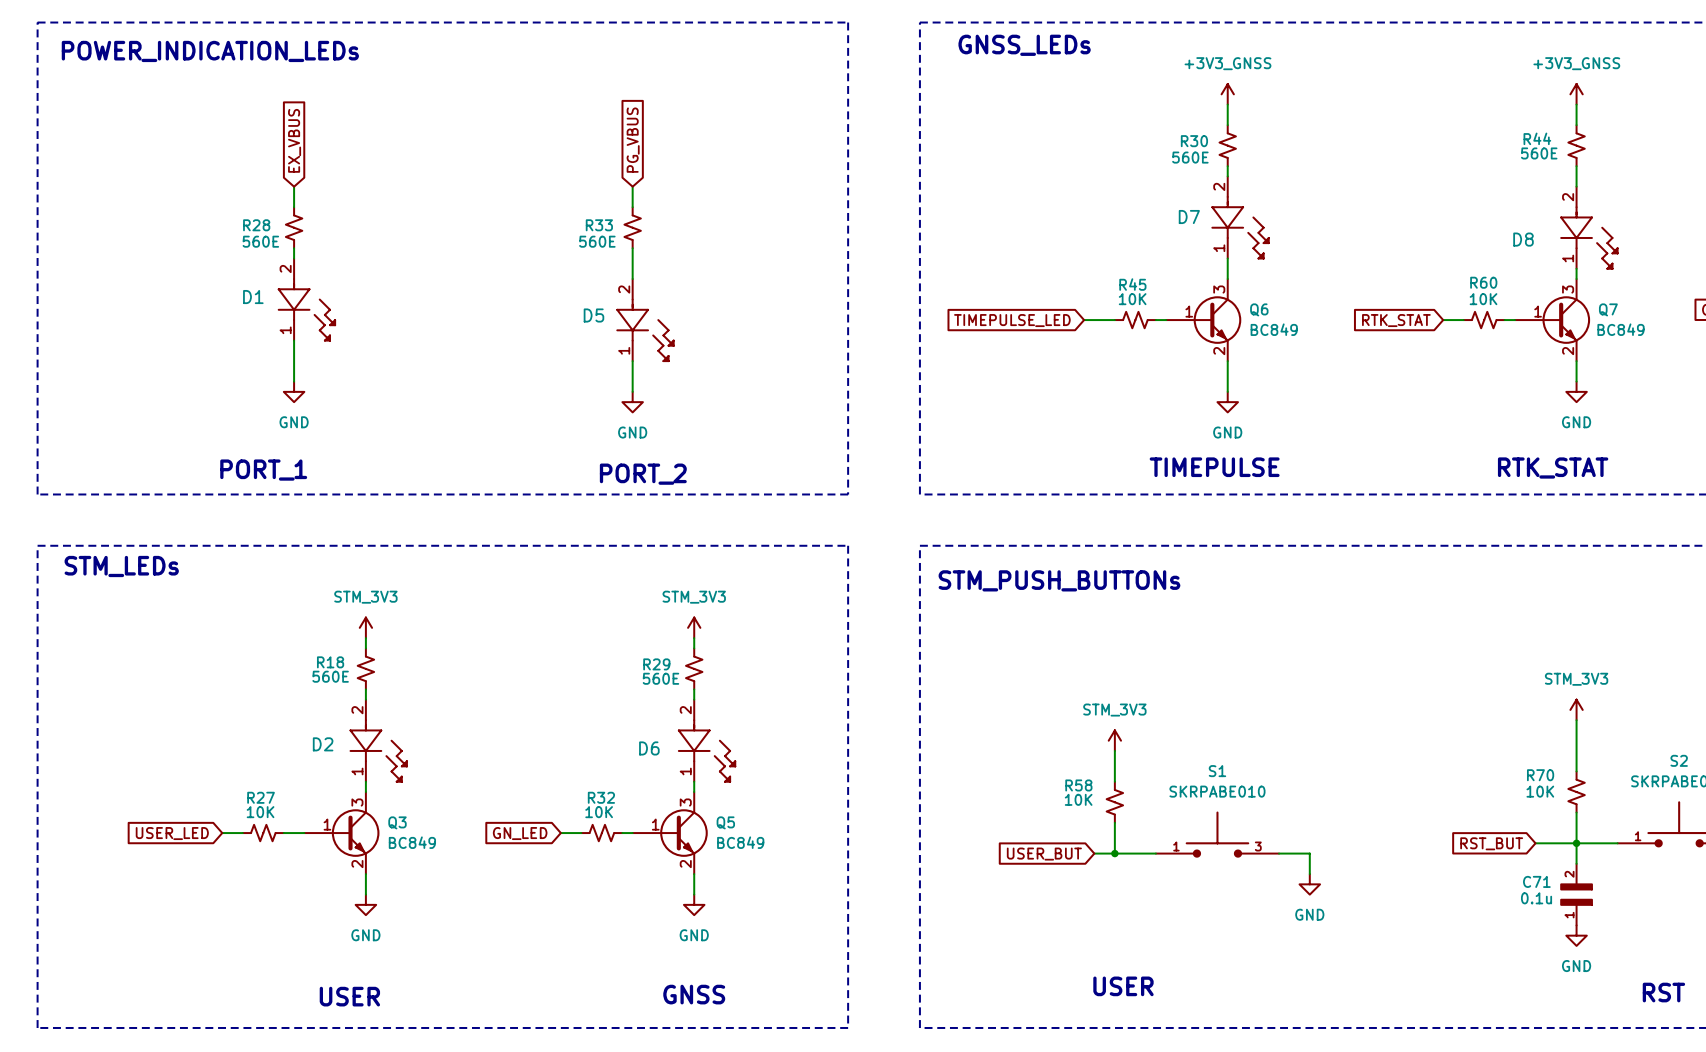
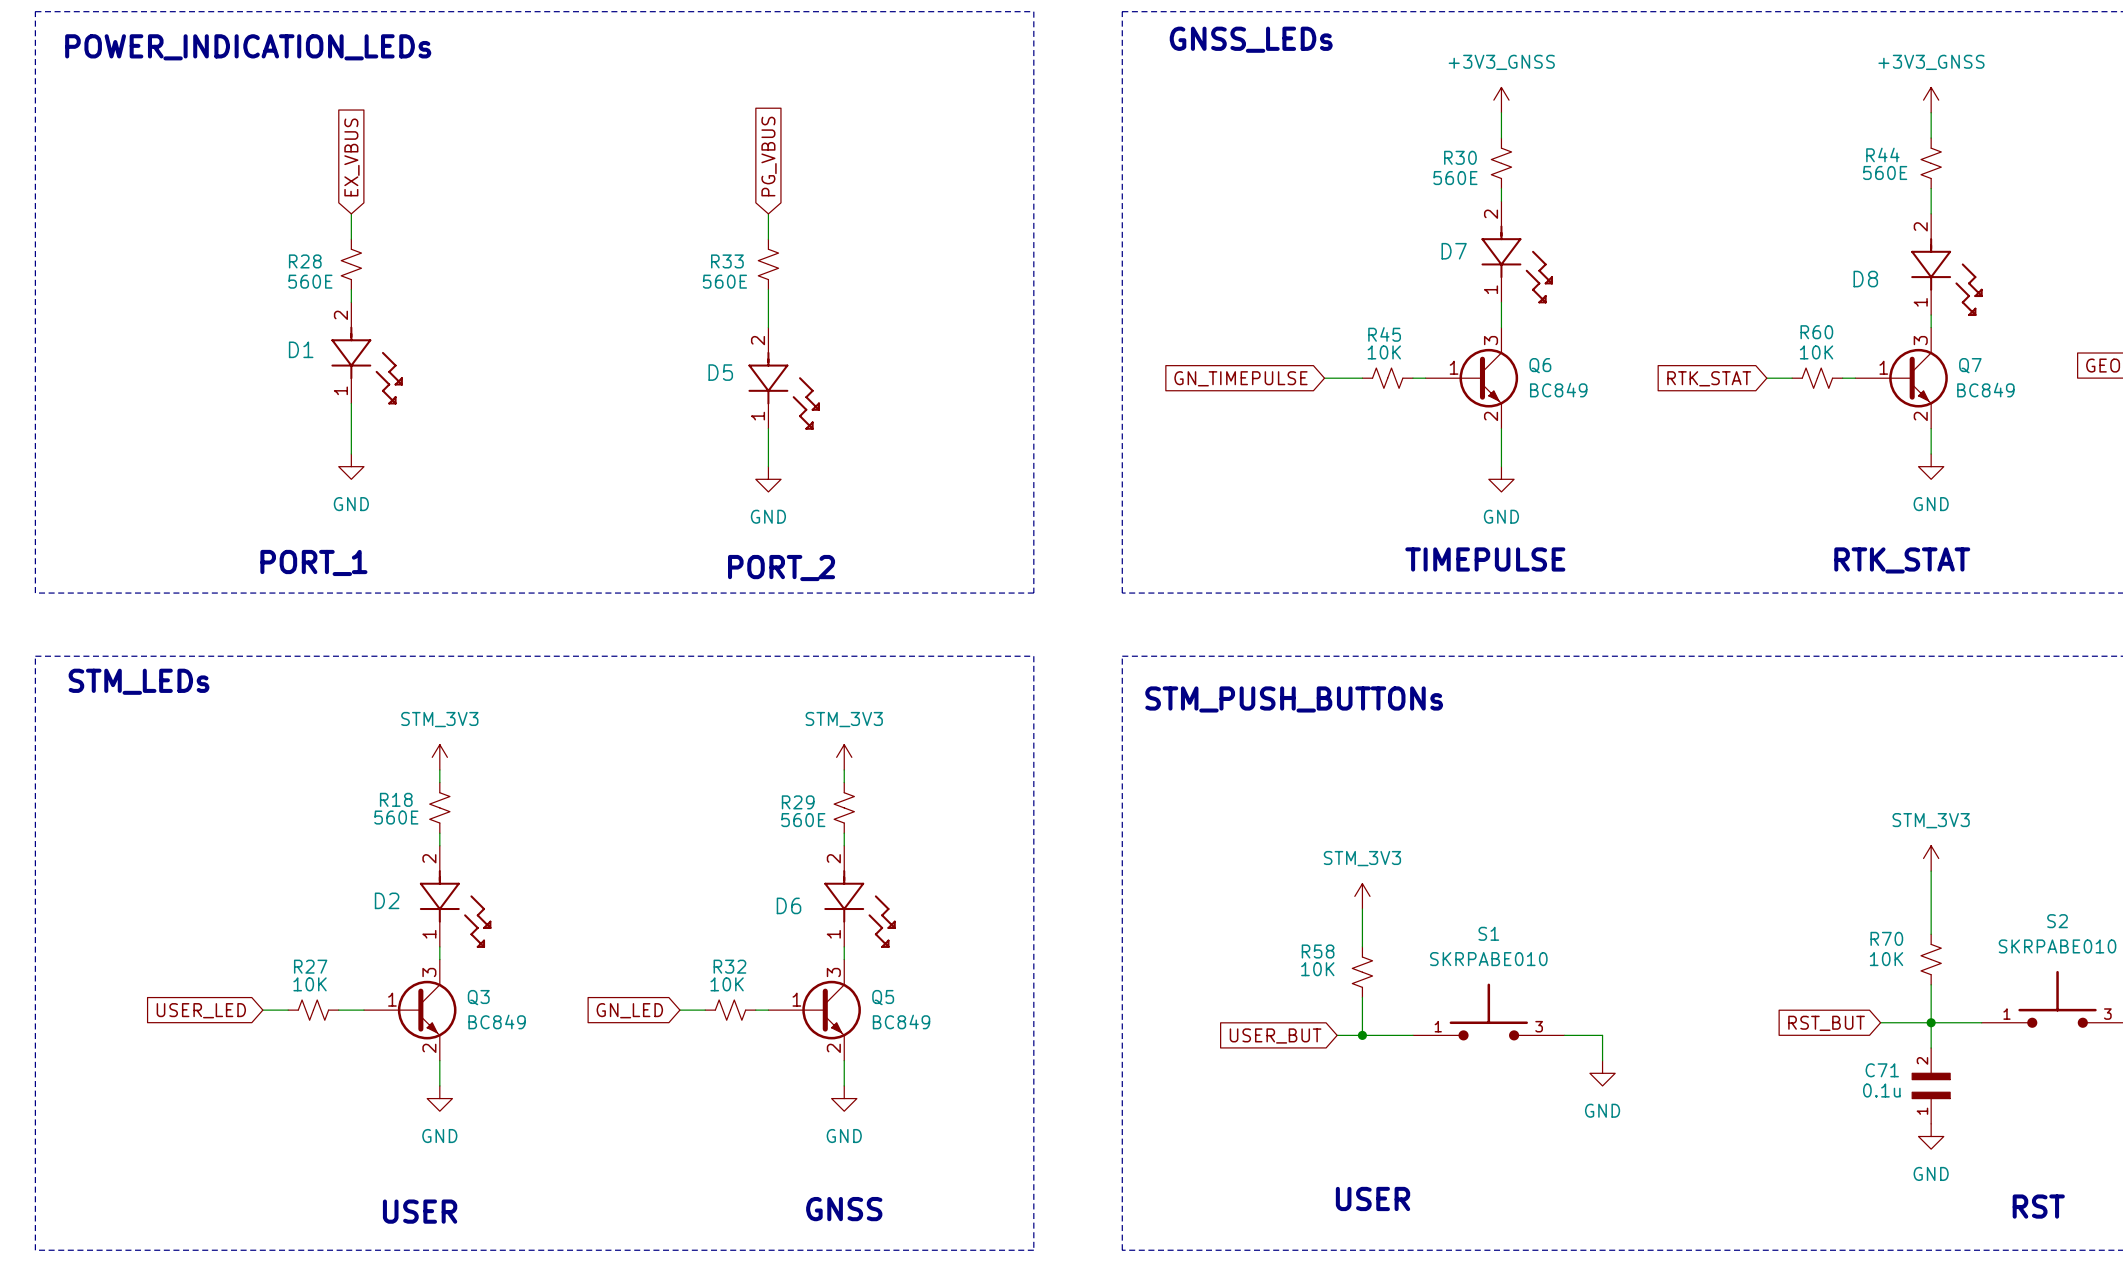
global label: TIMEPULSE_LED (1012, 320) -> GN_TIMEPULSE (1240, 378)

